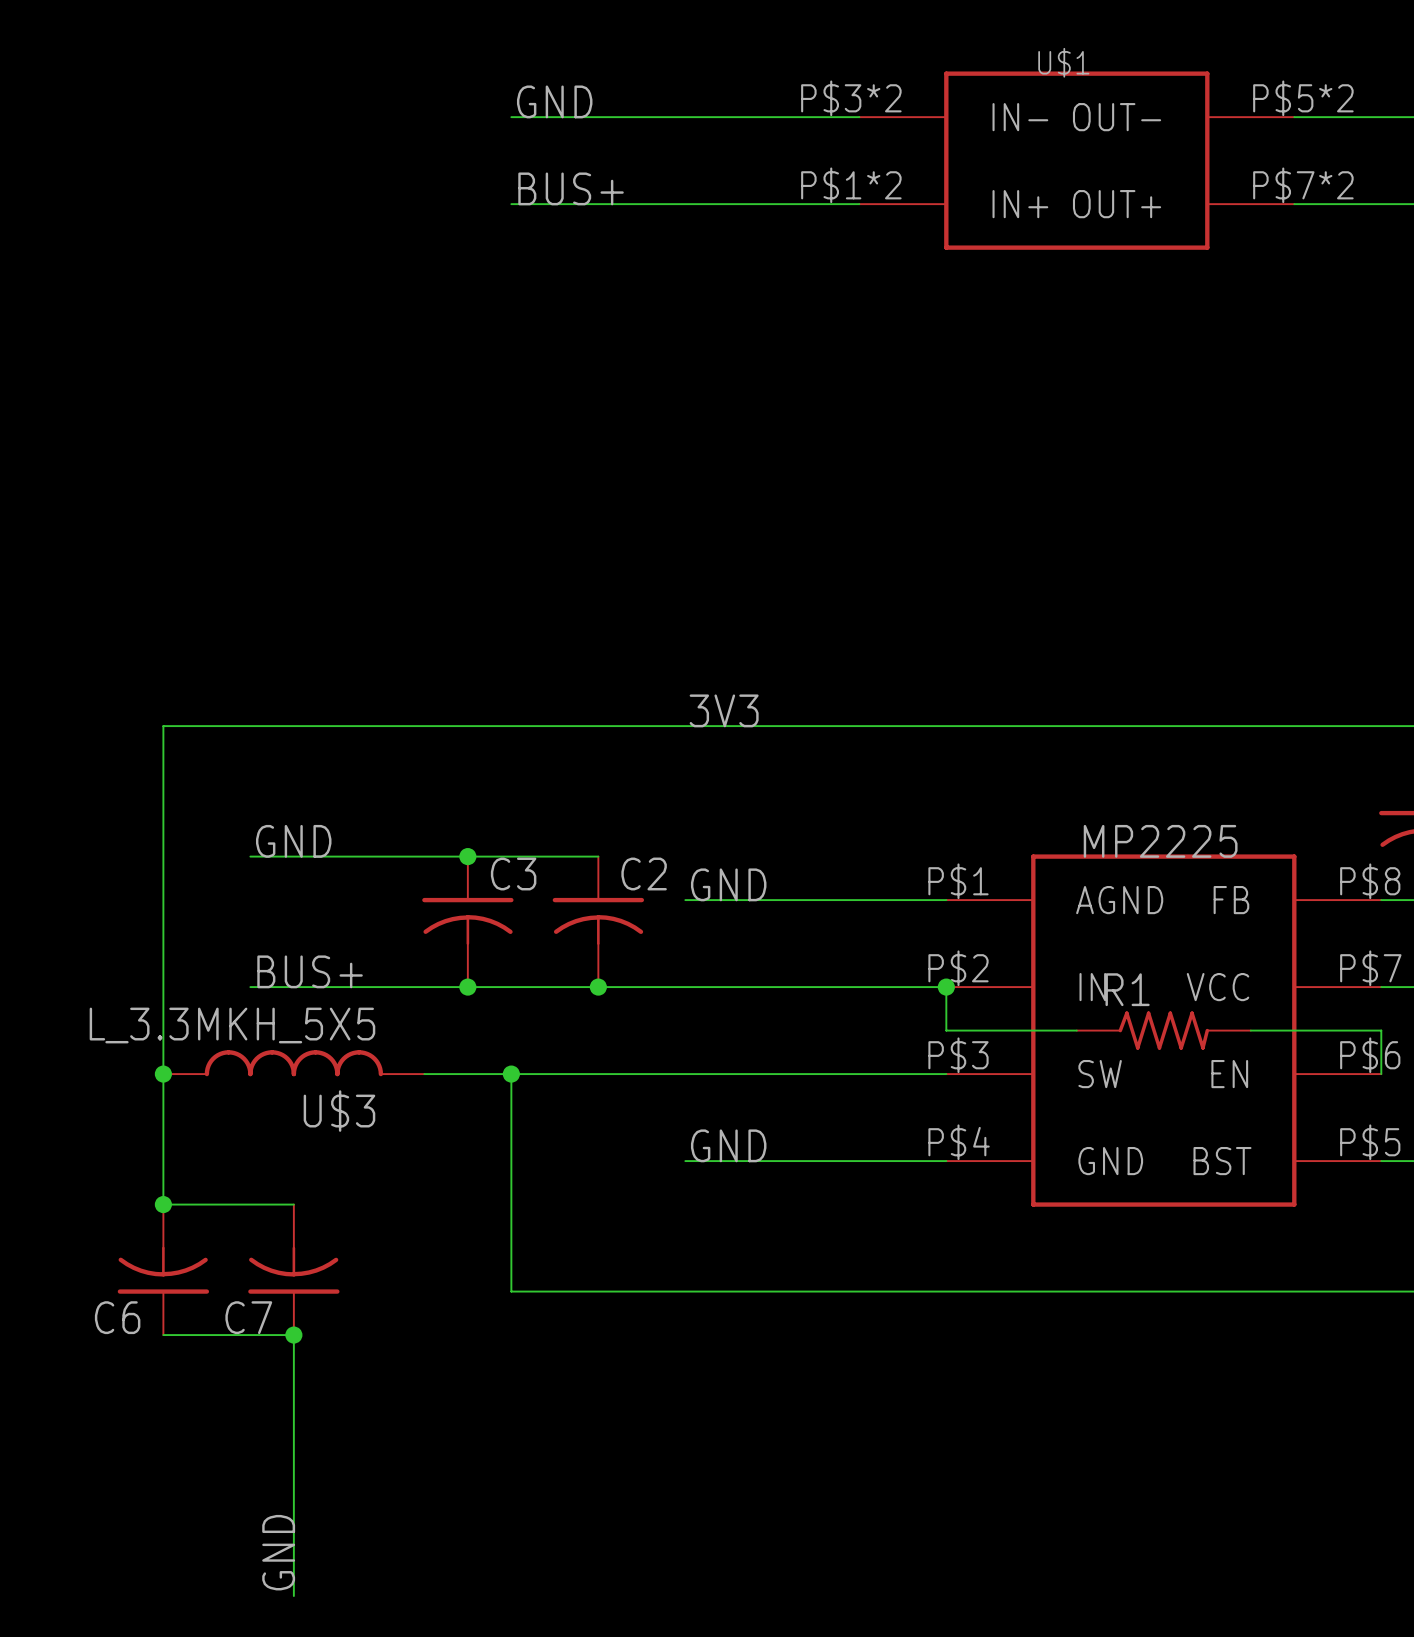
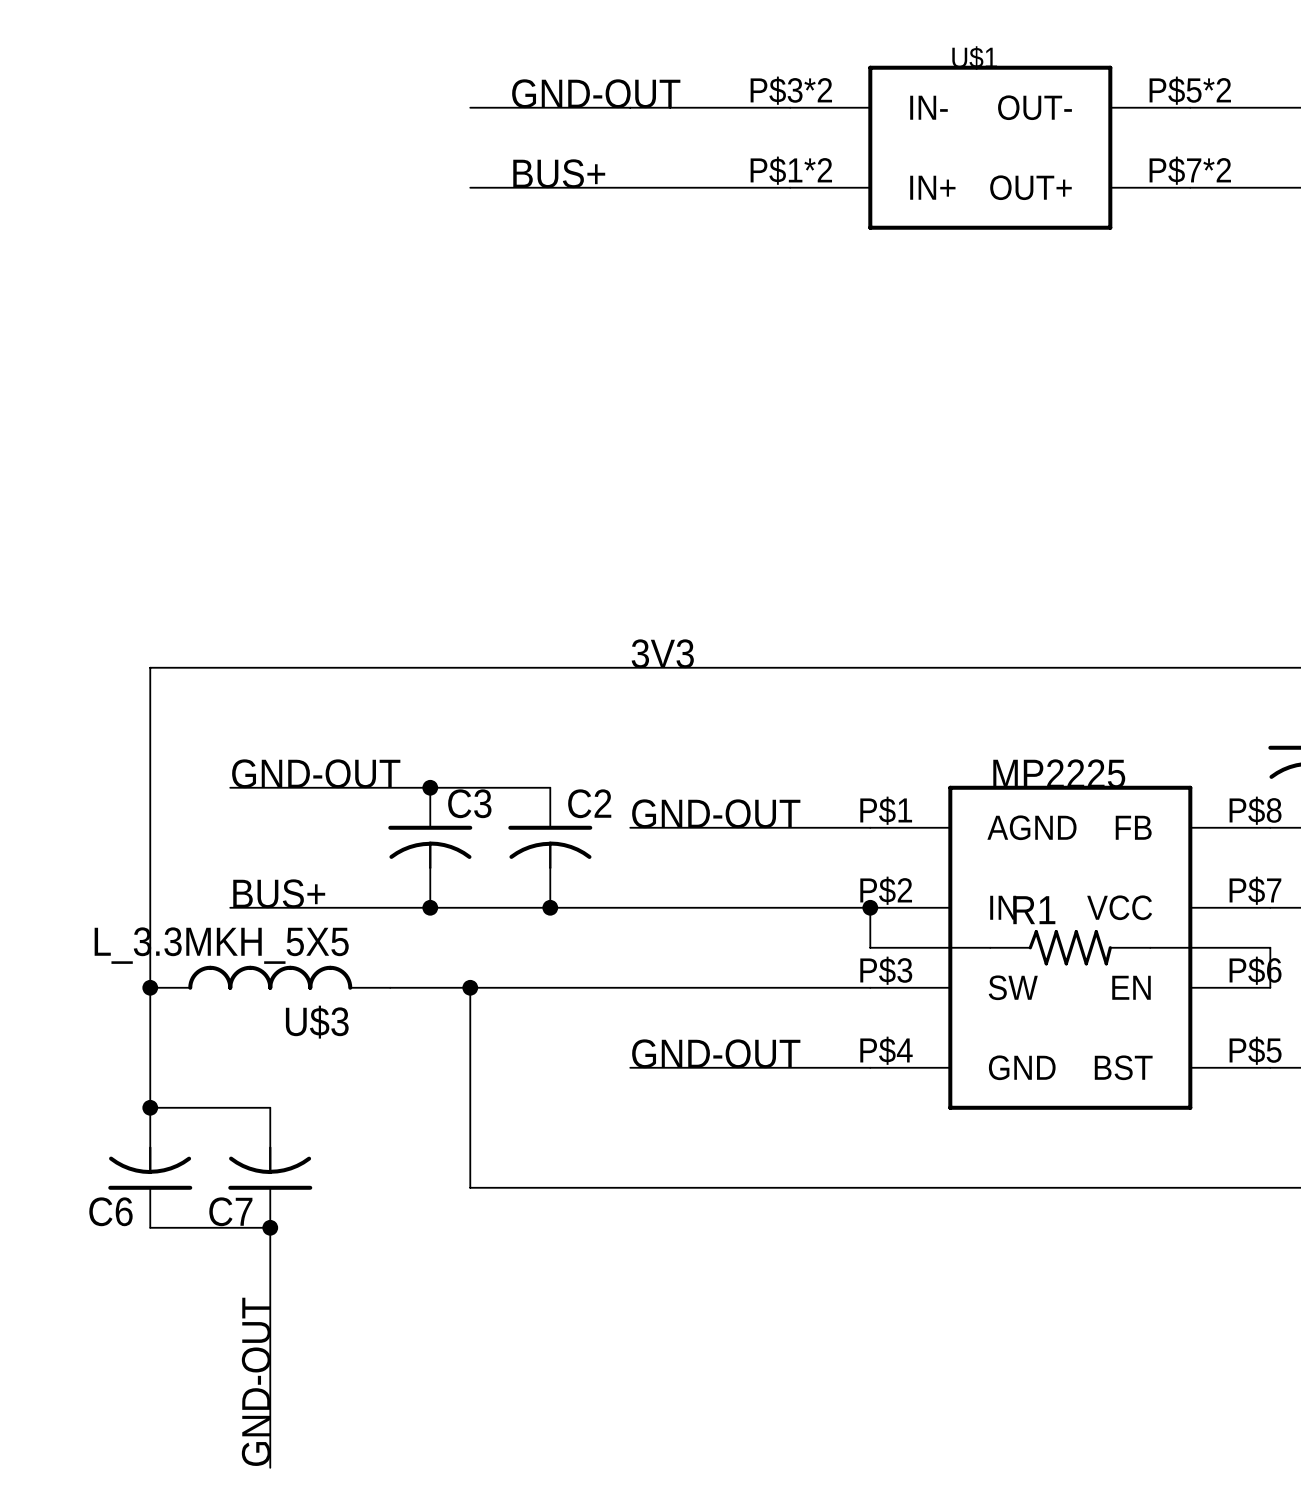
label: GND (554, 101) -> none
label: none -> GND-OUT (596, 93)
label position: BUS+ (571, 188) -> BUS+ (559, 173)
label: GND (293, 841) -> GND-OUT (316, 773)
label: GND (728, 884) -> GND-OUT (716, 813)
label: GND (728, 1145) -> GND-OUT (716, 1053)
label: GND (278, 1552) -> GND-OUT (256, 1381)

